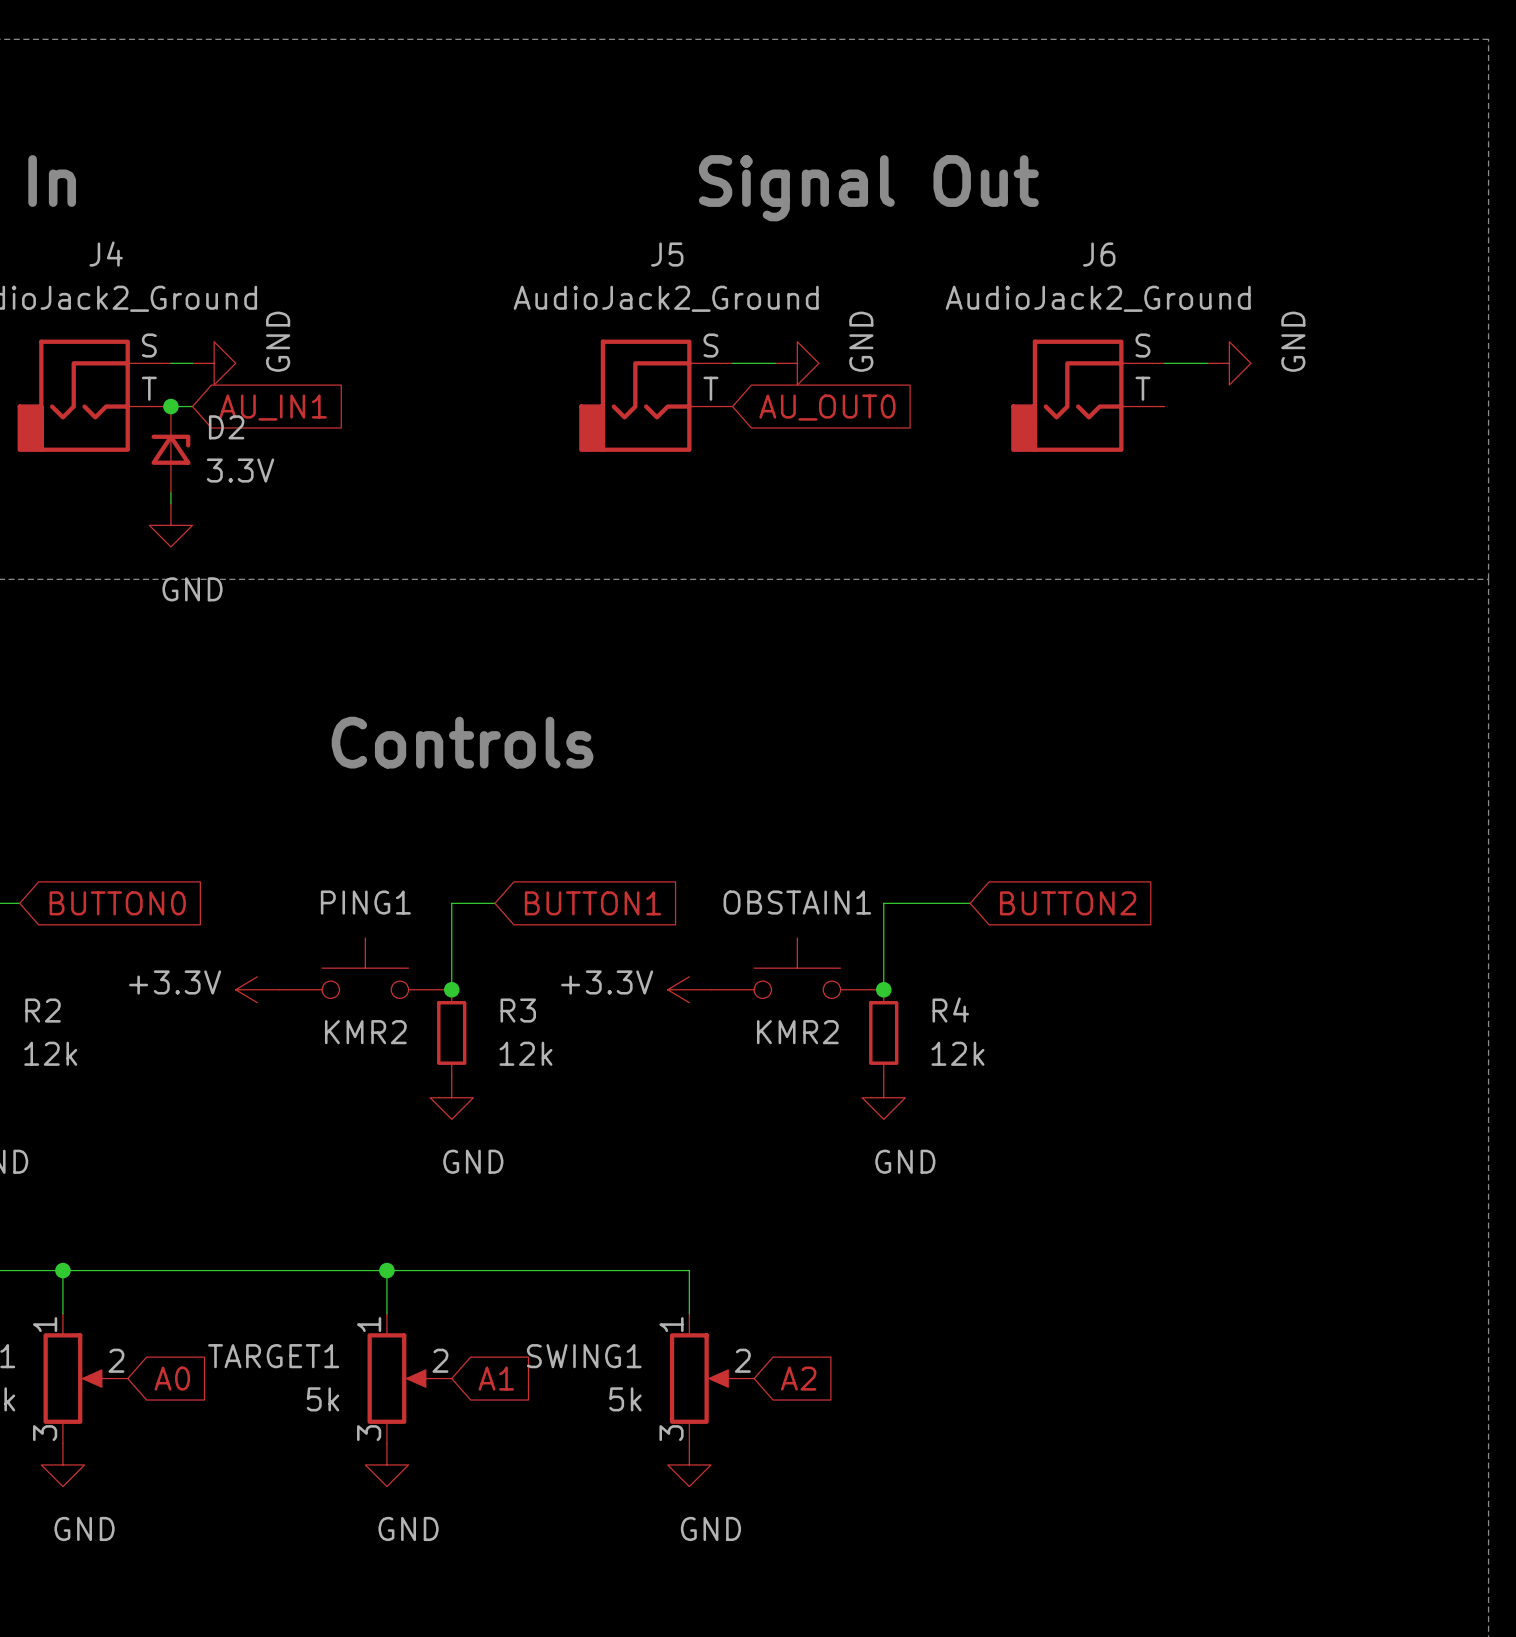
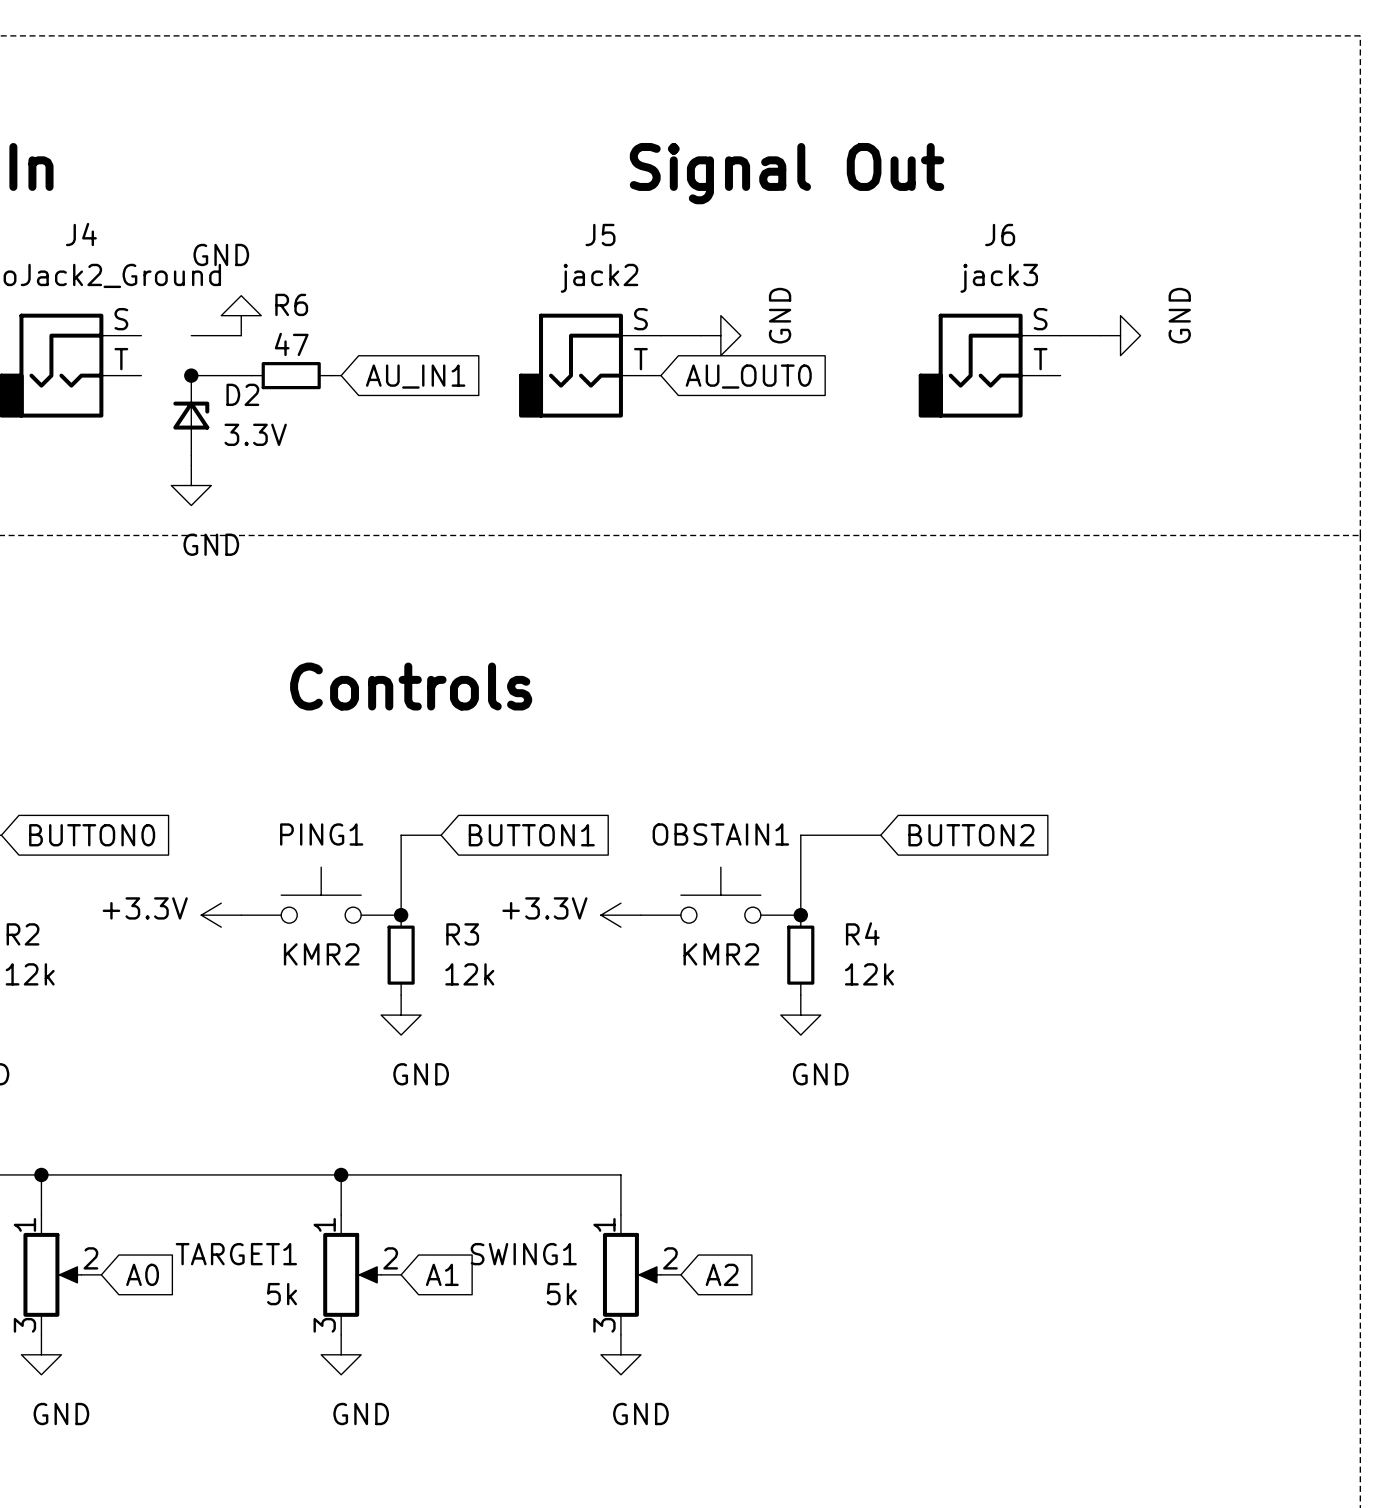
J5 value: AudioJack2_Ground (666, 298) -> jack2 (599, 278)
J6 value: AudioJack2_Ground (1098, 298) -> jack3 (999, 278)
wire: (170, 363) (192, 363) -> none
power symbol rotation: 0° (214, 363) -> 90° counterclockwise (241, 315)
power symbol position: GND (214, 363) -> GND (241, 315)
wire: none -> (191, 335) (241, 335)
wire: (170, 406) (192, 406) -> none
junction position: (170, 406) -> (191, 375)
wire: none -> (191, 375) (251, 375)
R6: none -> 47 (291, 375)
wire: none -> (331, 375) (341, 375)
global label position: AU_IN1 (273, 407) -> AU_IN1 (415, 376)
D2 position: (170, 449) -> (191, 415)
wire: (170, 492) (170, 503) -> (191, 455) (191, 465)
power symbol position: GND (170, 525) -> GND (191, 485)

